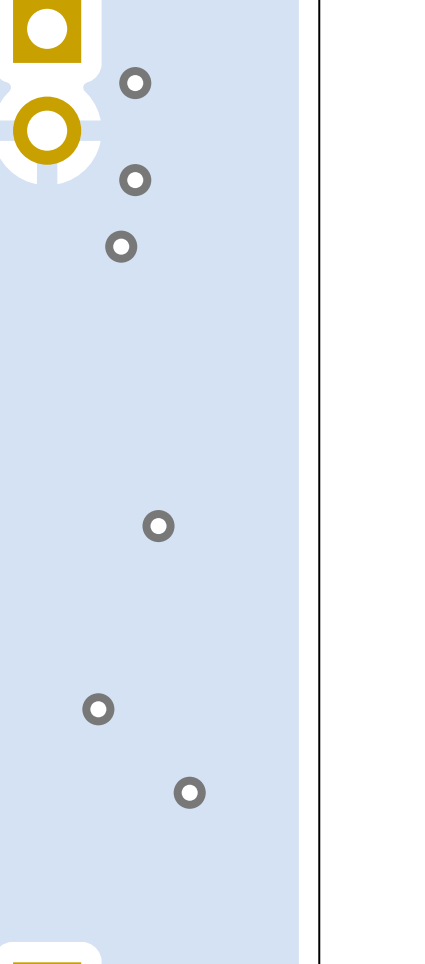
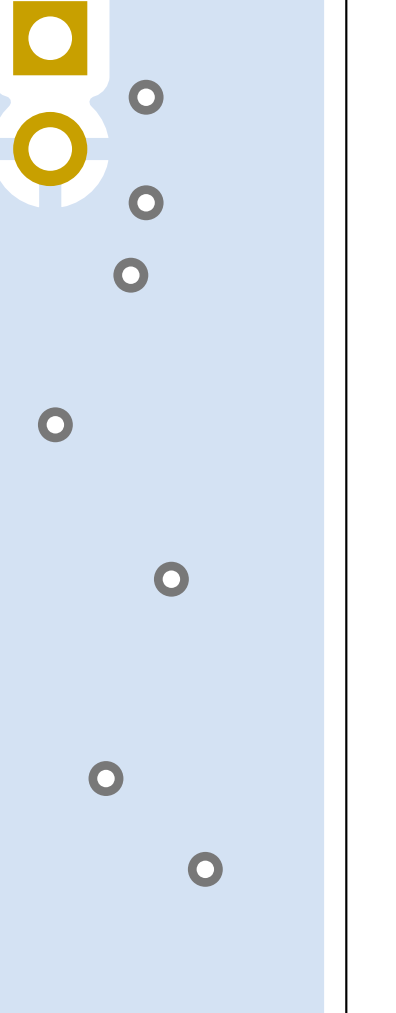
via: none -> (55, 424)

